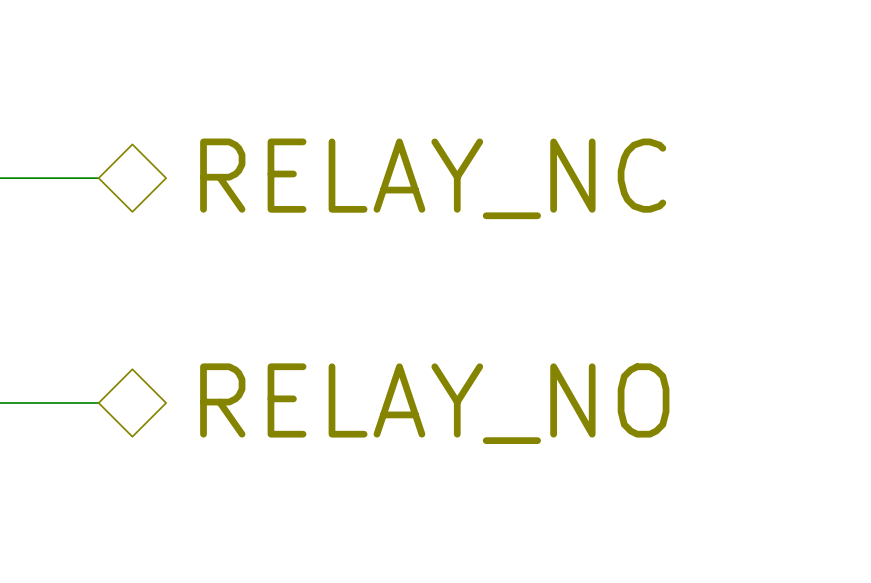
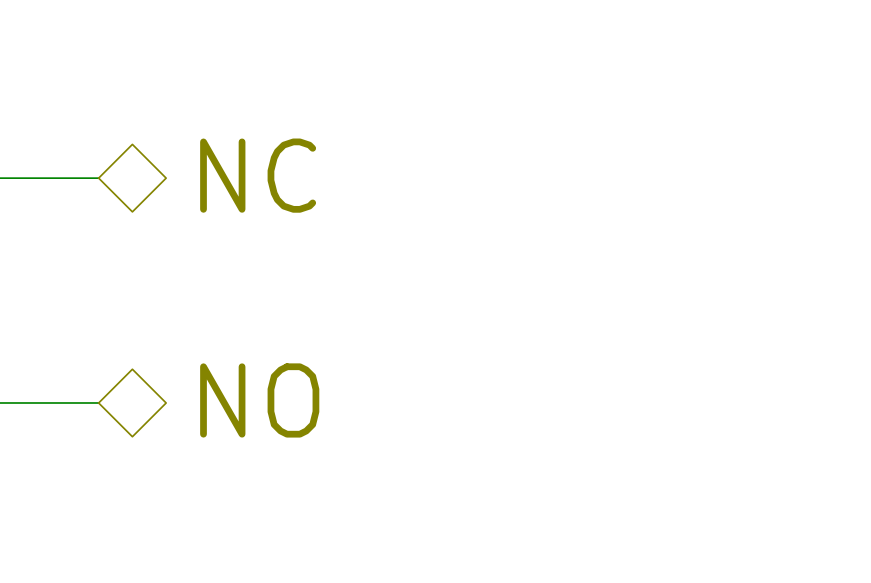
hierarchical label: RELAY_NC (433, 178) -> NC (258, 175)
hierarchical label: RELAY_NO (434, 403) -> NO (259, 400)

